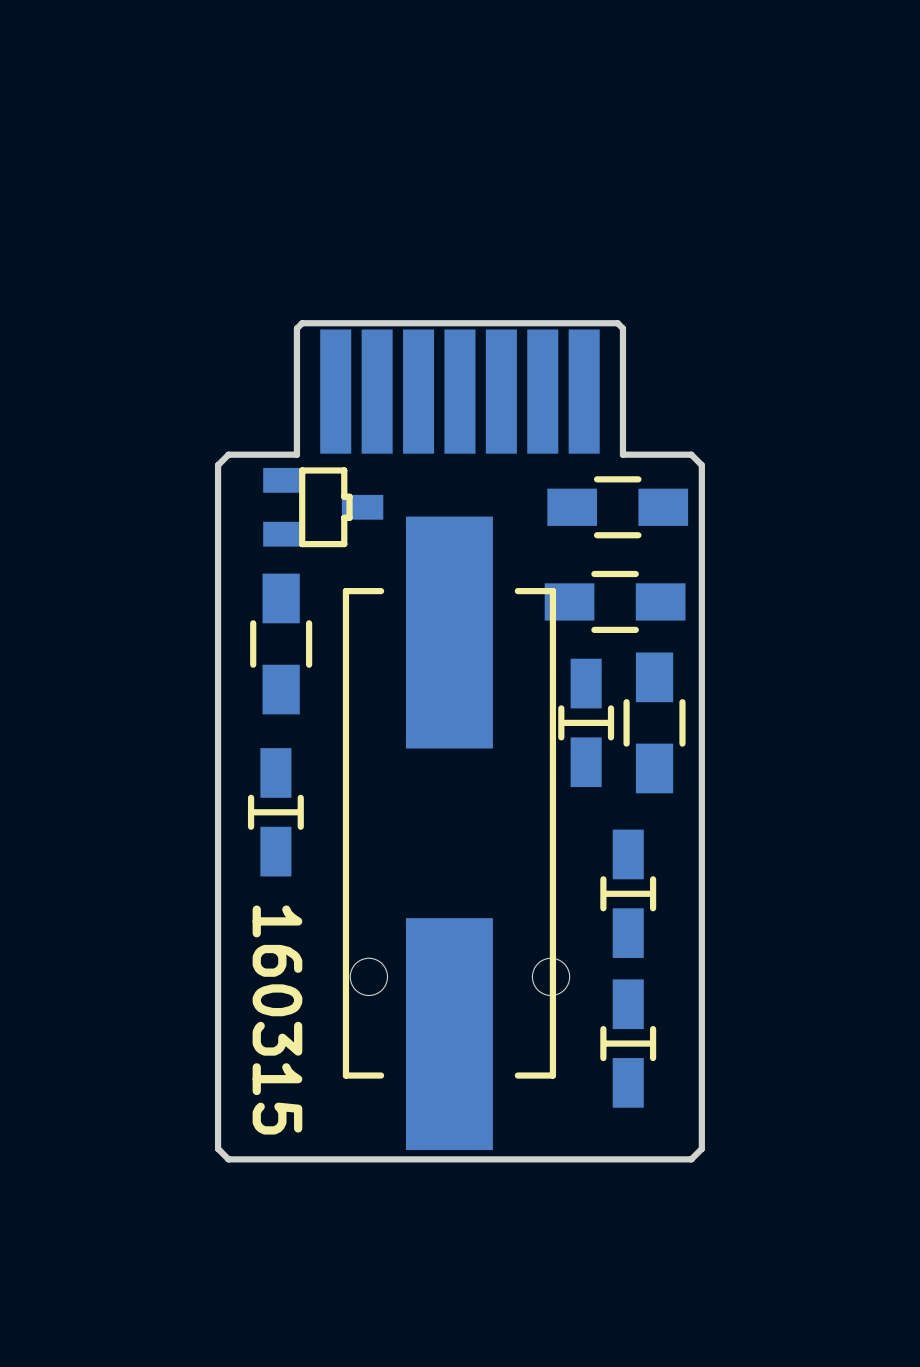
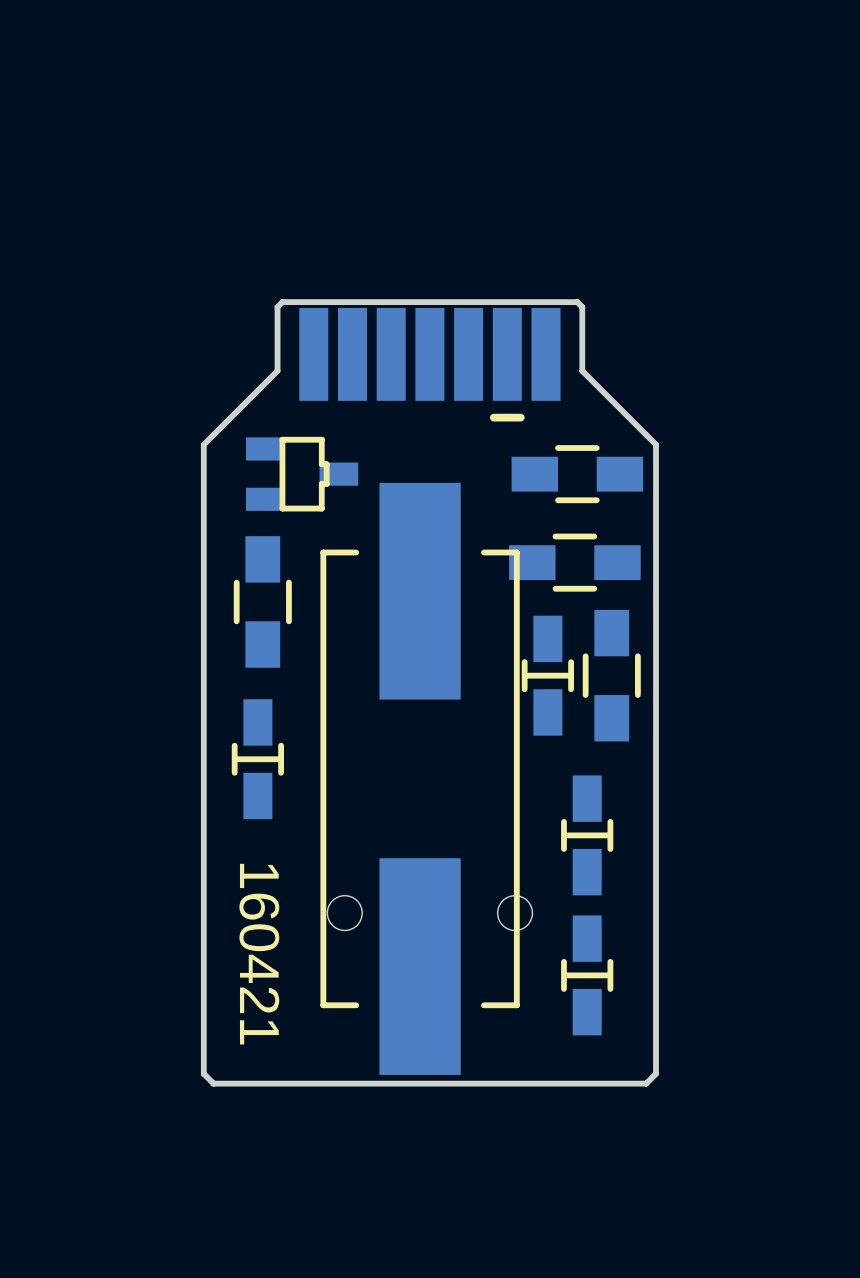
part footprint: [320, 329, 600, 454] -> [299, 307, 561, 401]
board edge: (296, 396) (296, 454) (228, 454) (218, 465) (218, 475) -> (277, 370) (203, 444)
board edge: (622, 396) (622, 454) (691, 454) (701, 465) (701, 475) -> (582, 370) (656, 444)
line: none -> (520, 417) (493, 417)
text: 160315 (277, 1020) -> 160421 (259, 954)

